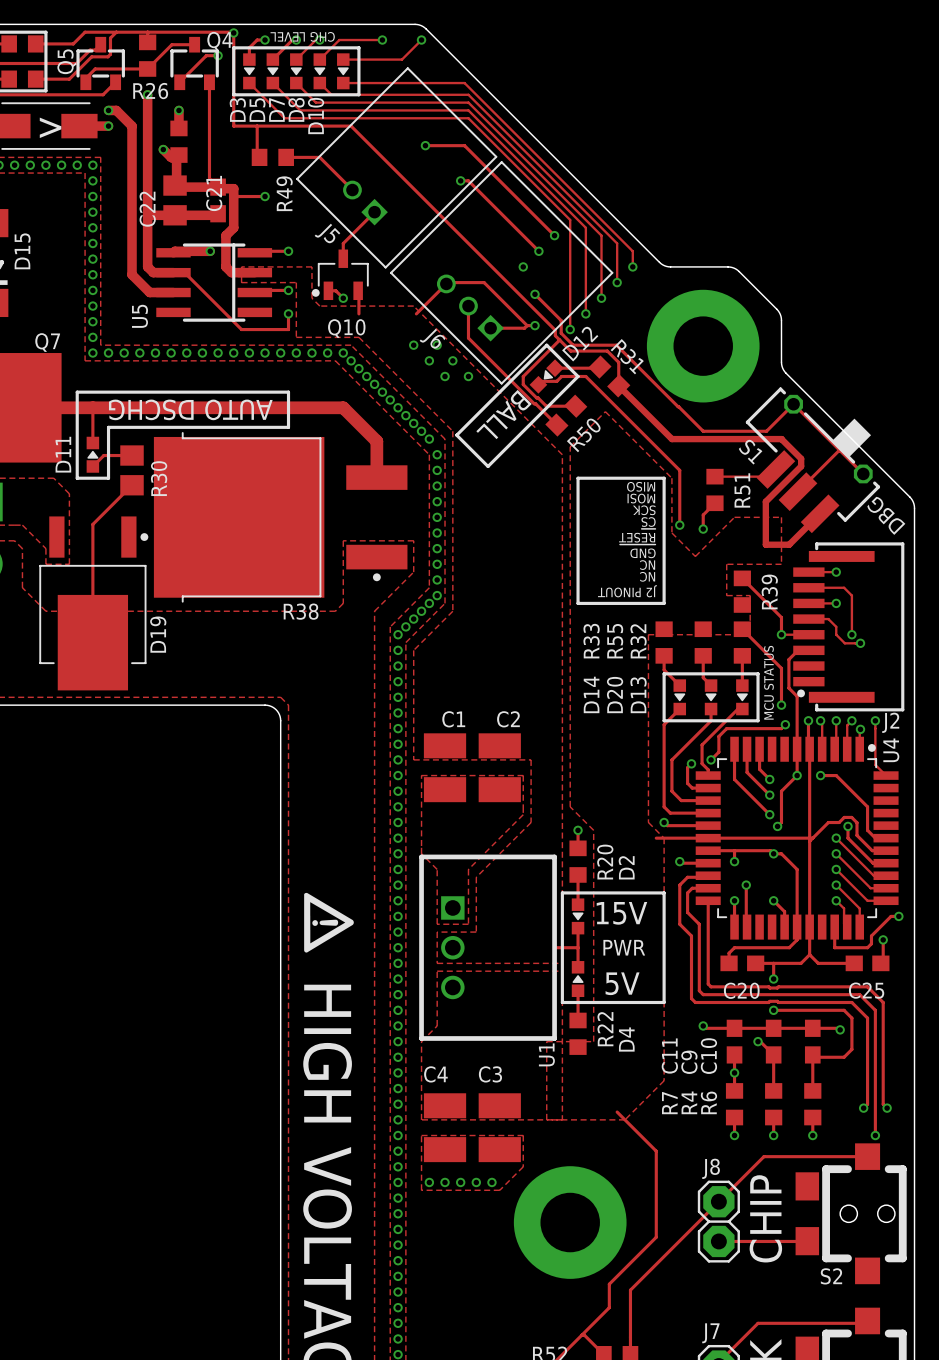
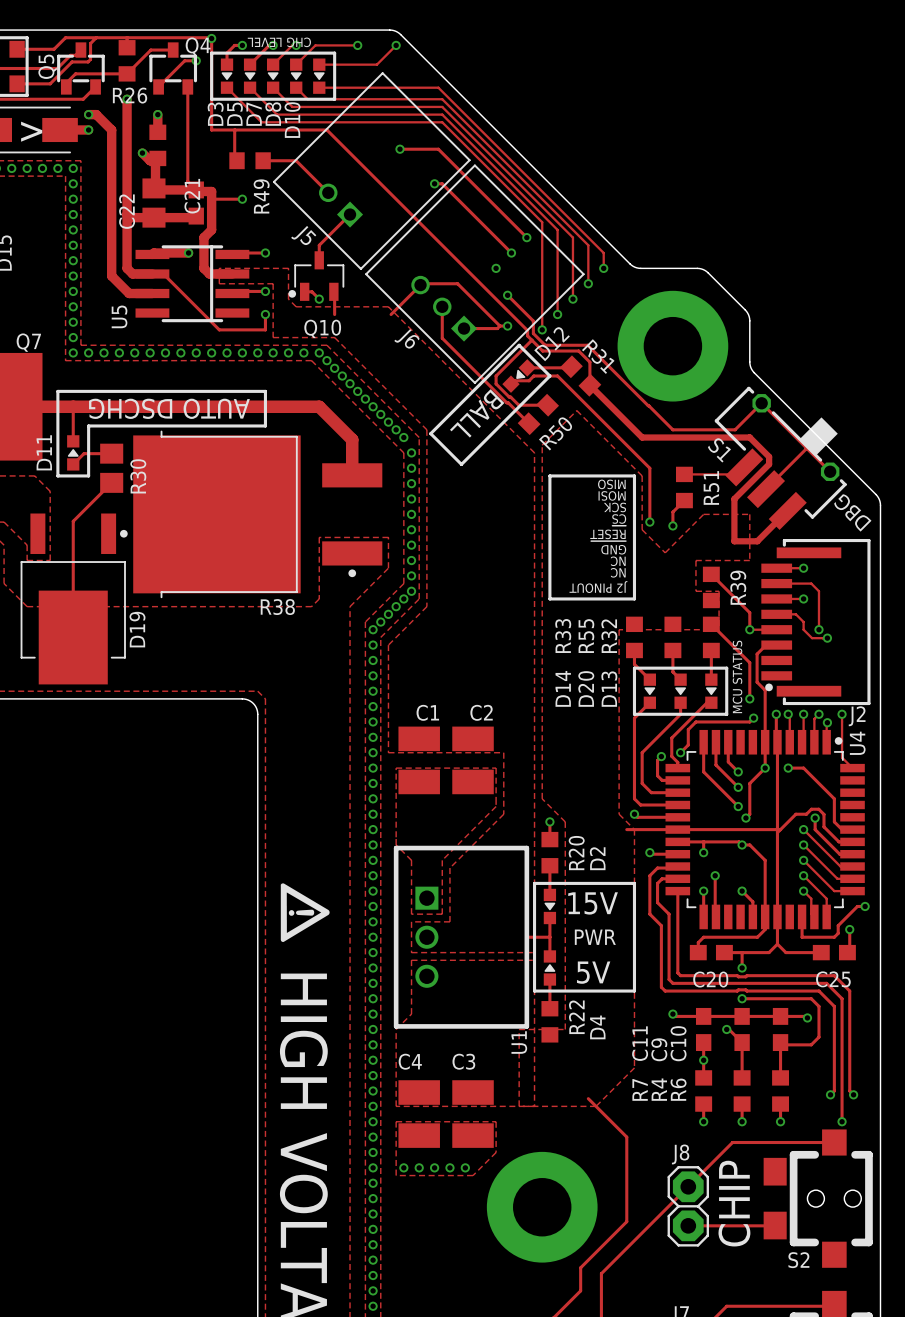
via: (413, 345) -> none
via: (437, 345) -> none
via: (429, 360) -> none
via: (452, 360) -> none
via: (445, 376) -> none
via: (468, 376) -> none

